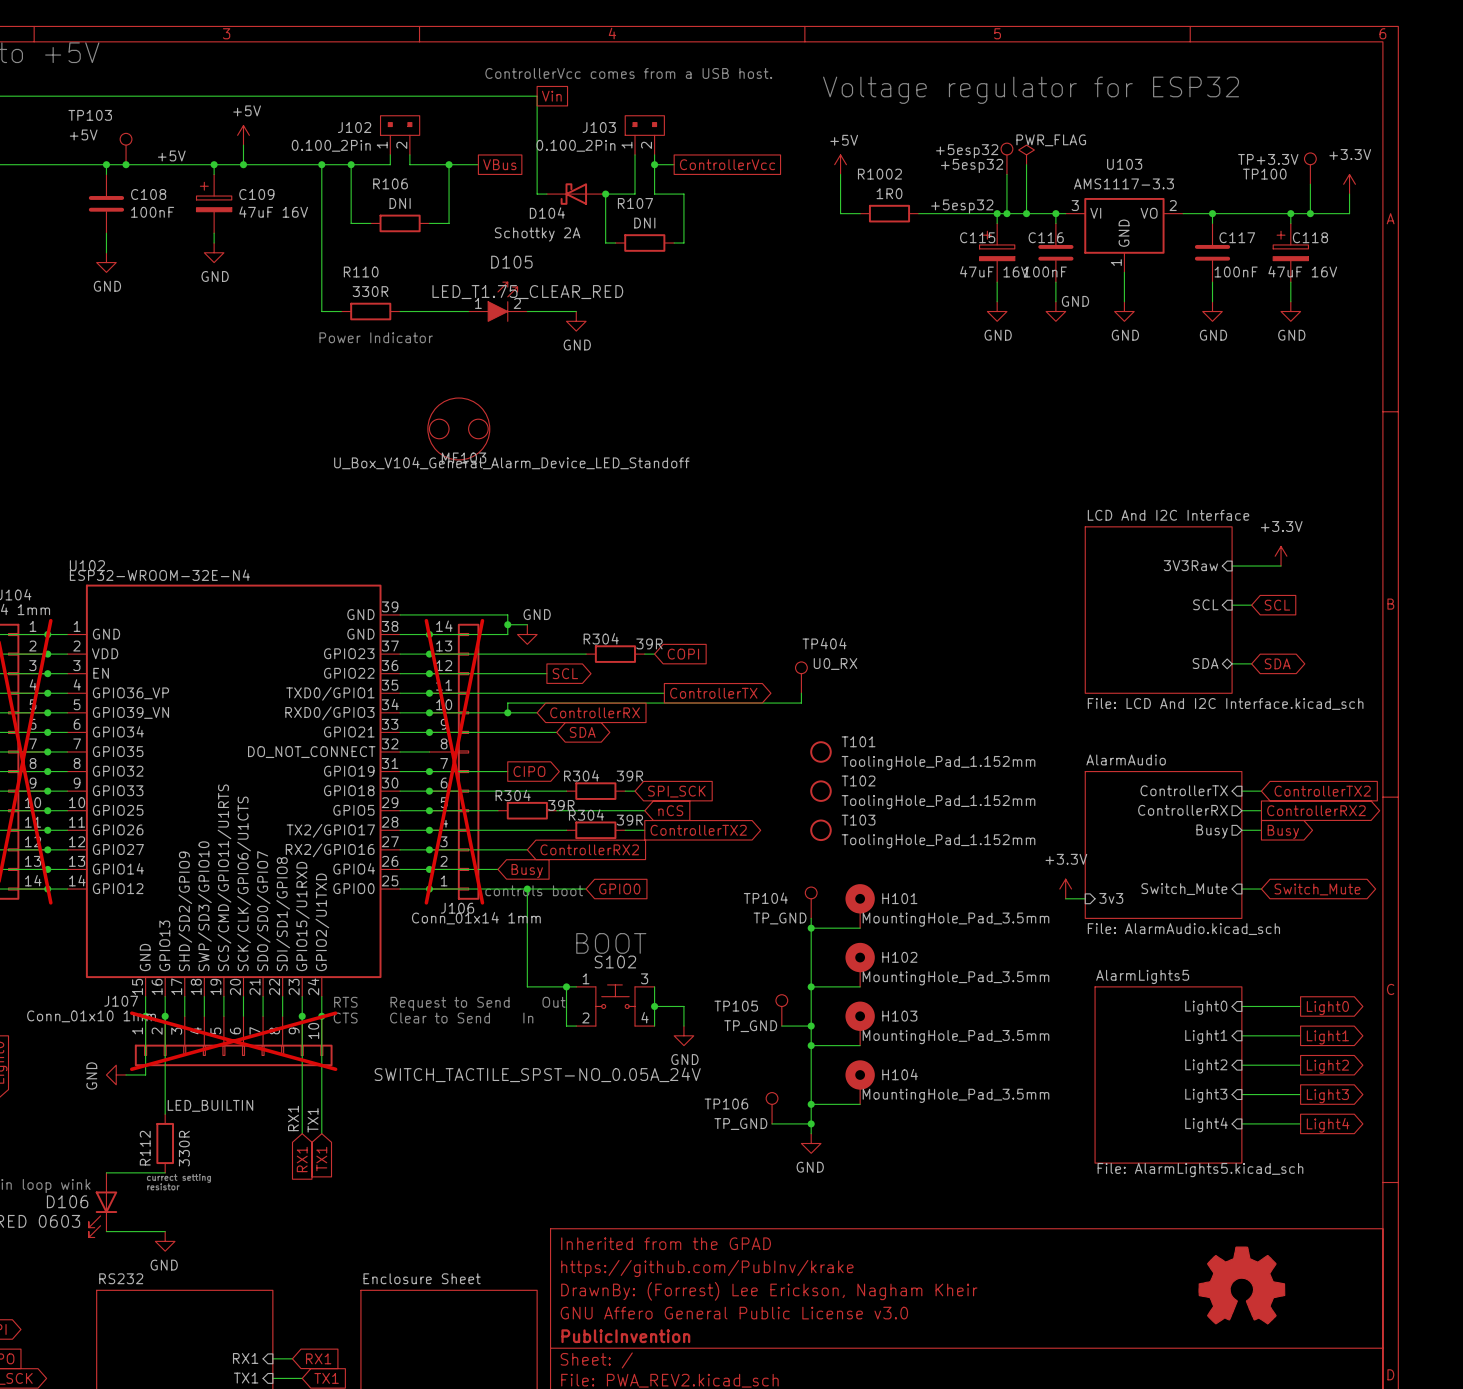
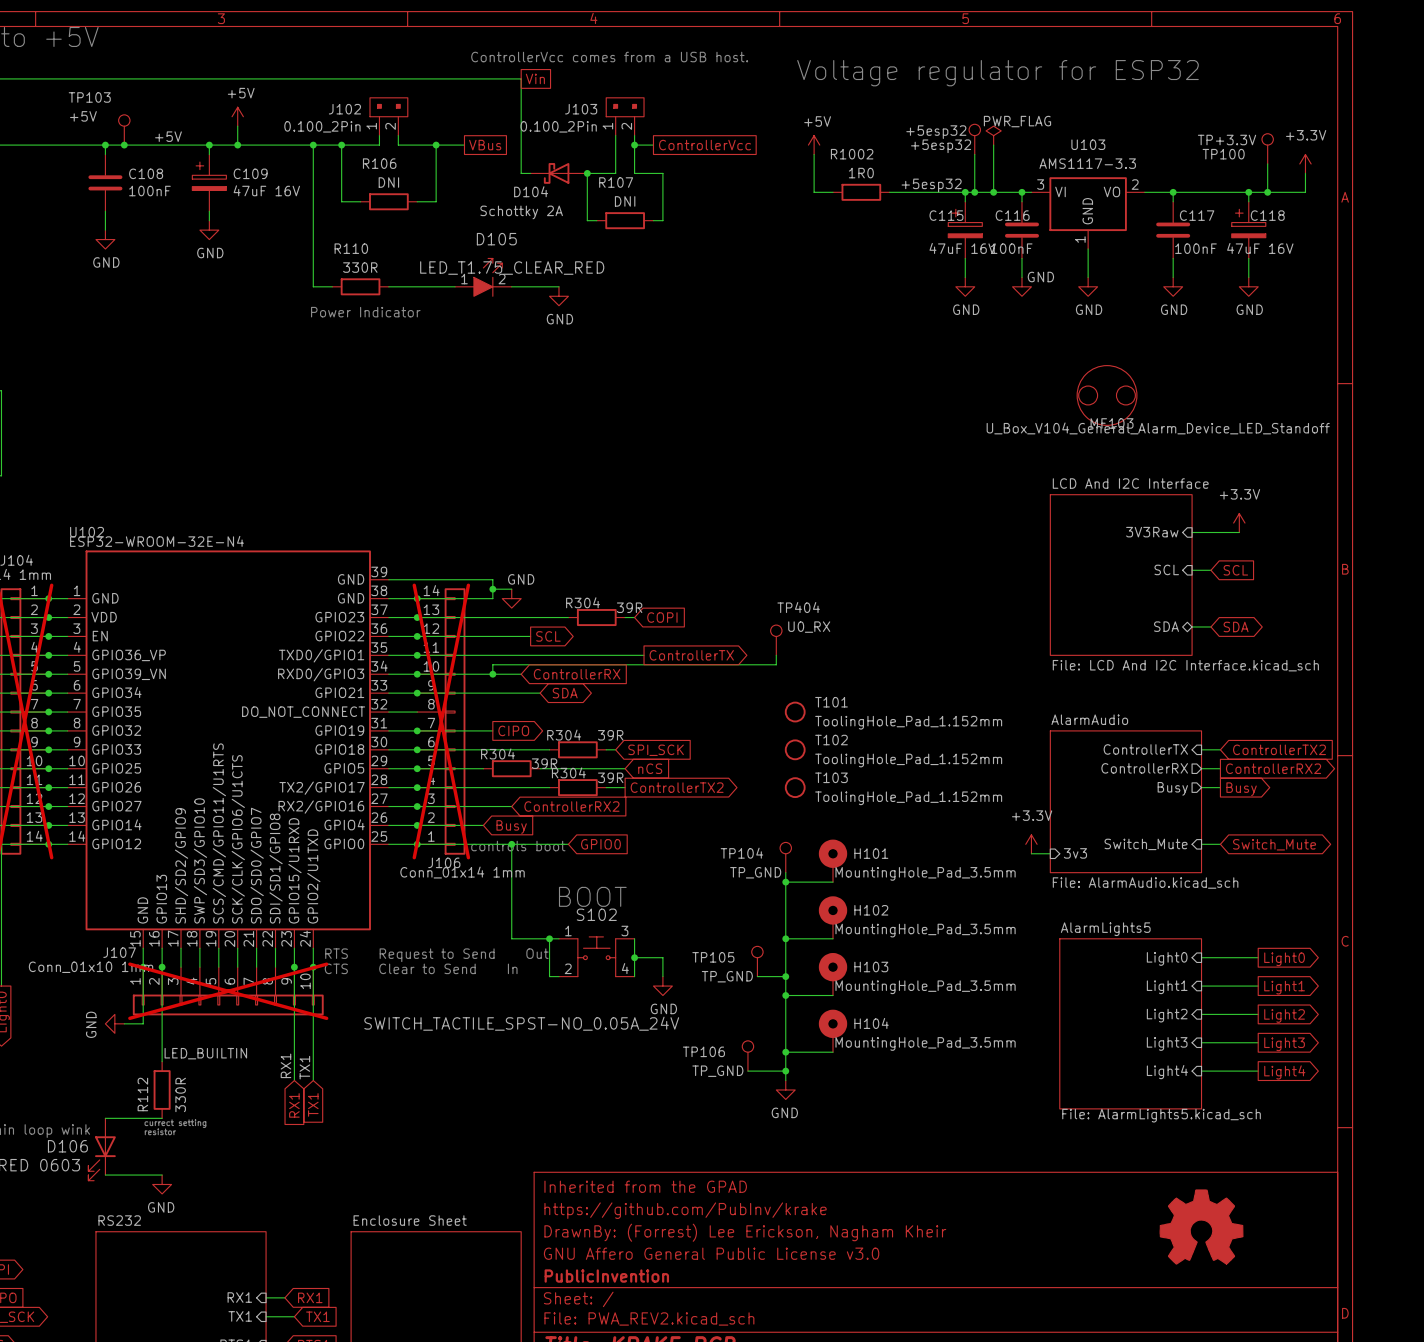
MF103 position: (458, 428) -> (1107, 395)

